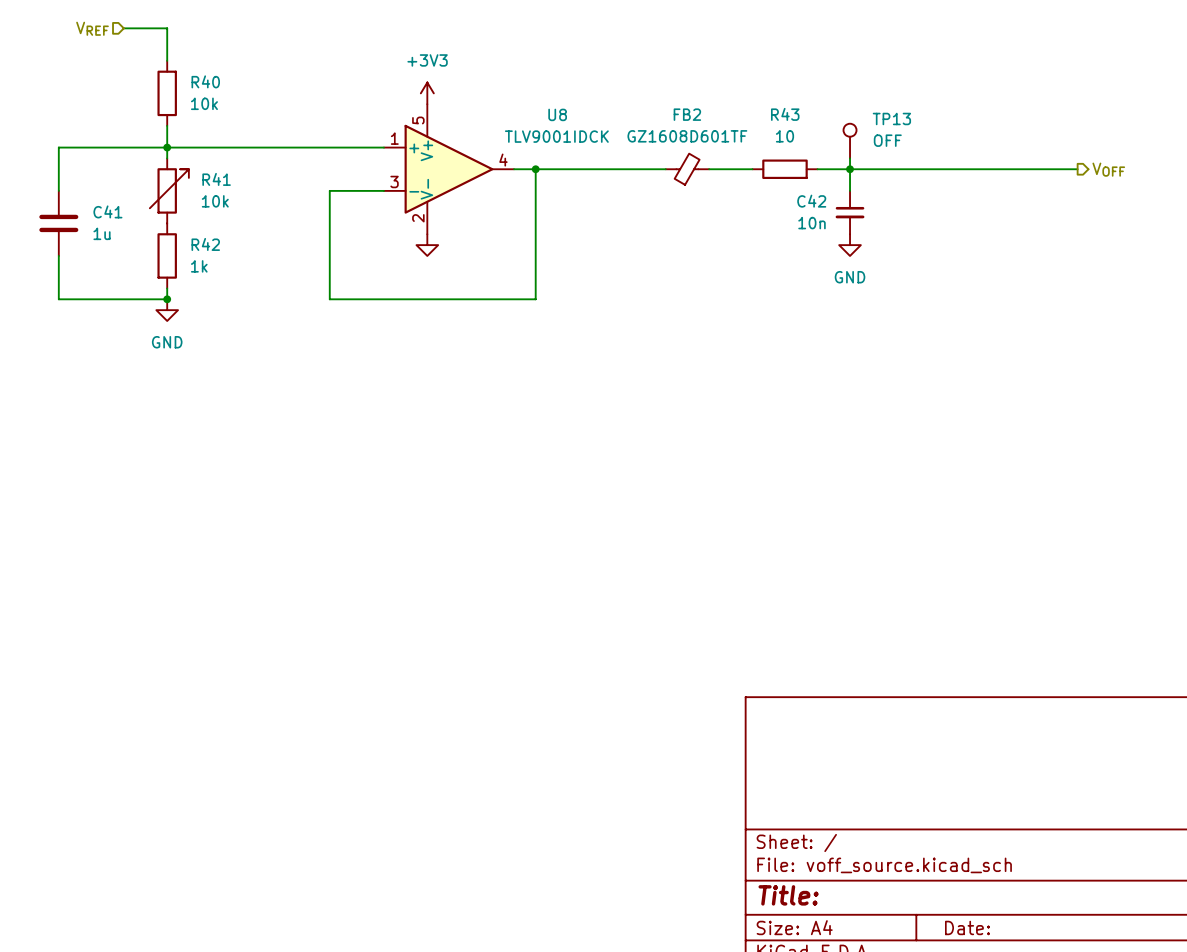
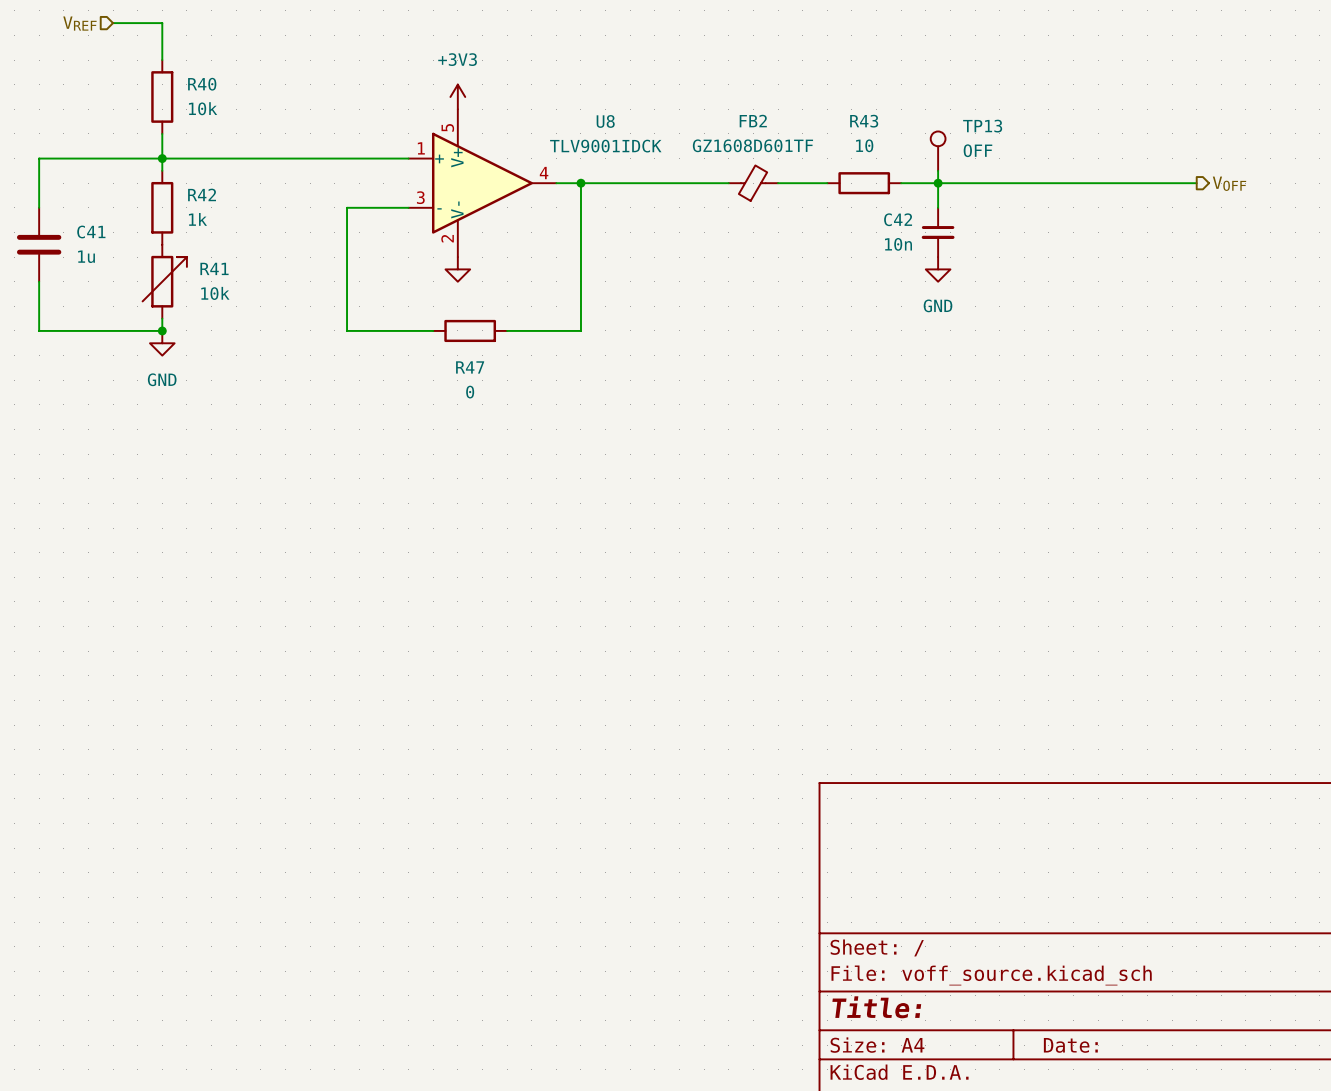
R41 position: (169, 190) -> (164, 281)
R42 position: (167, 255) -> (162, 207)
wire: (405, 299) (470, 299) -> none
R47: none -> 0 (470, 330)

